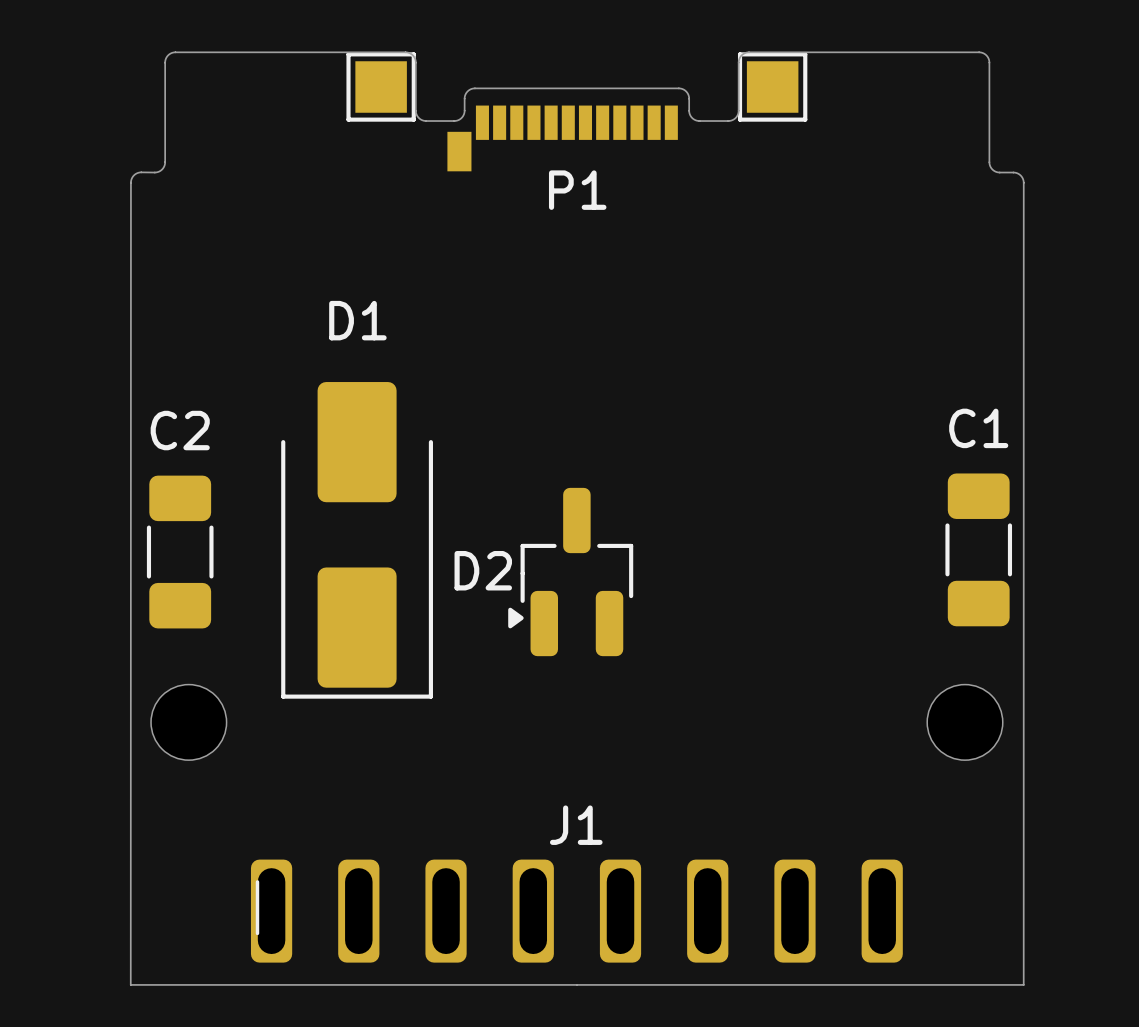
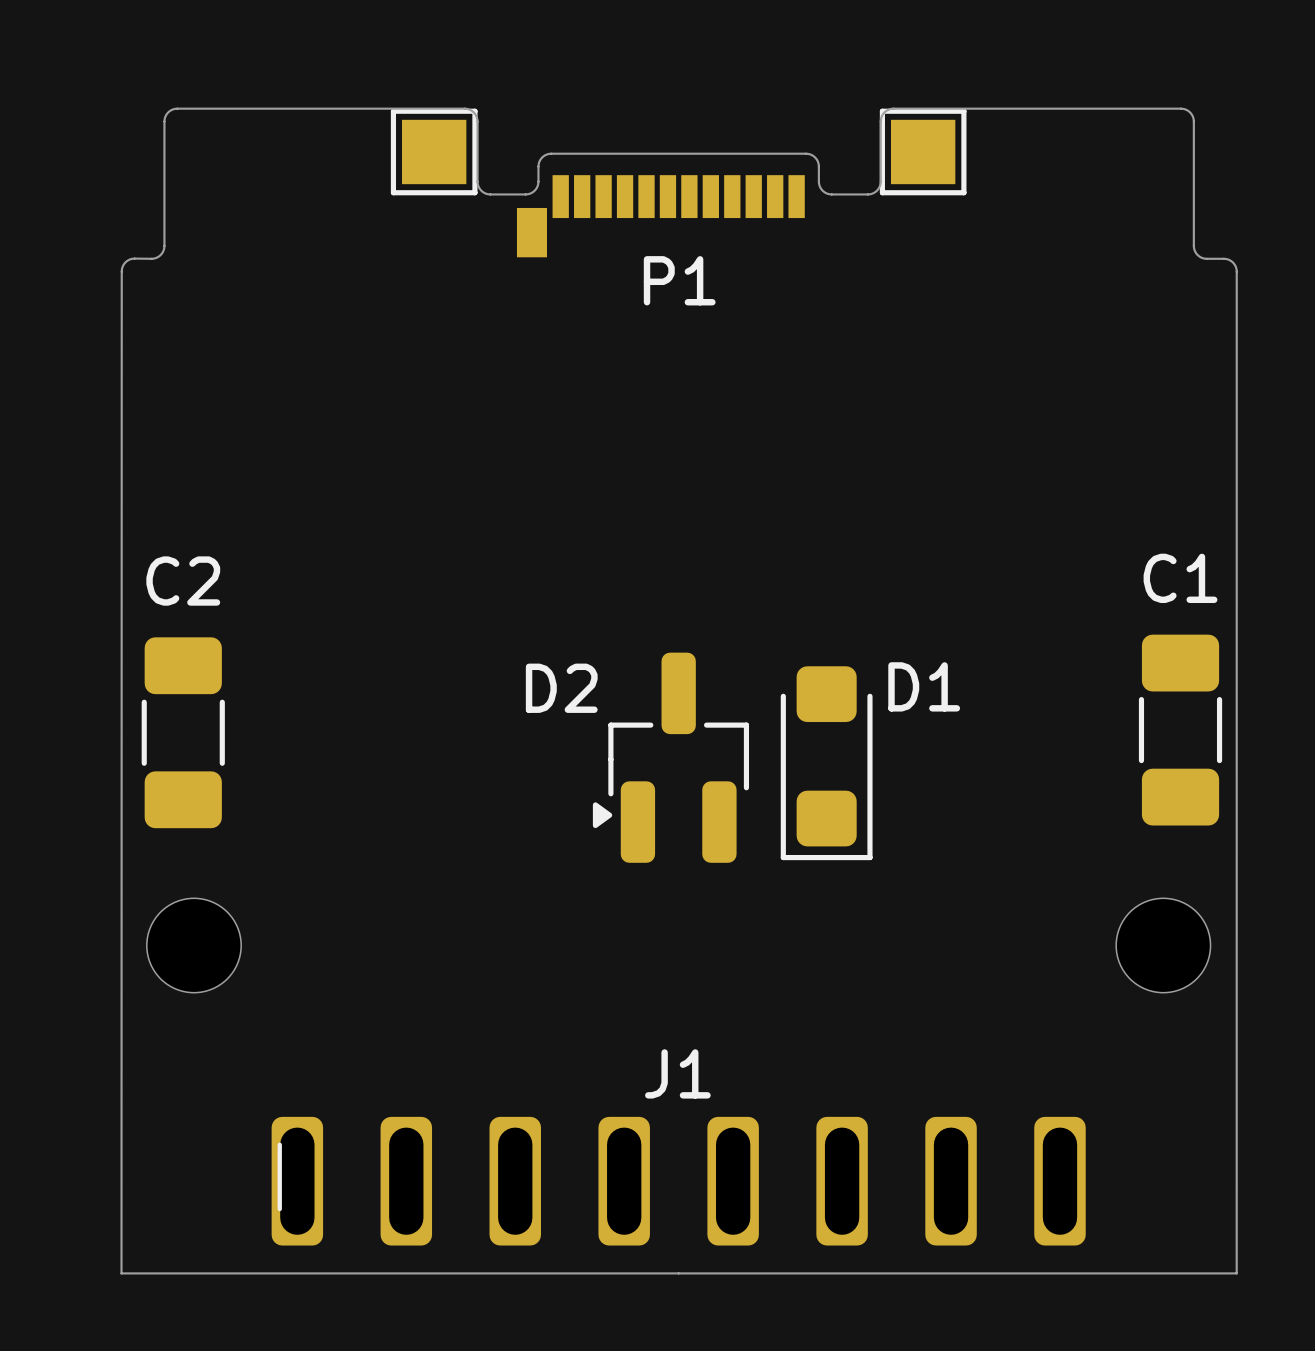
D1 name position: D1 (357, 320) -> D1 (924, 686)
D1 footprint: [281, 382, 433, 699] -> [780, 666, 873, 861]
D2 name position: D2 (483, 570) -> D2 (561, 688)

